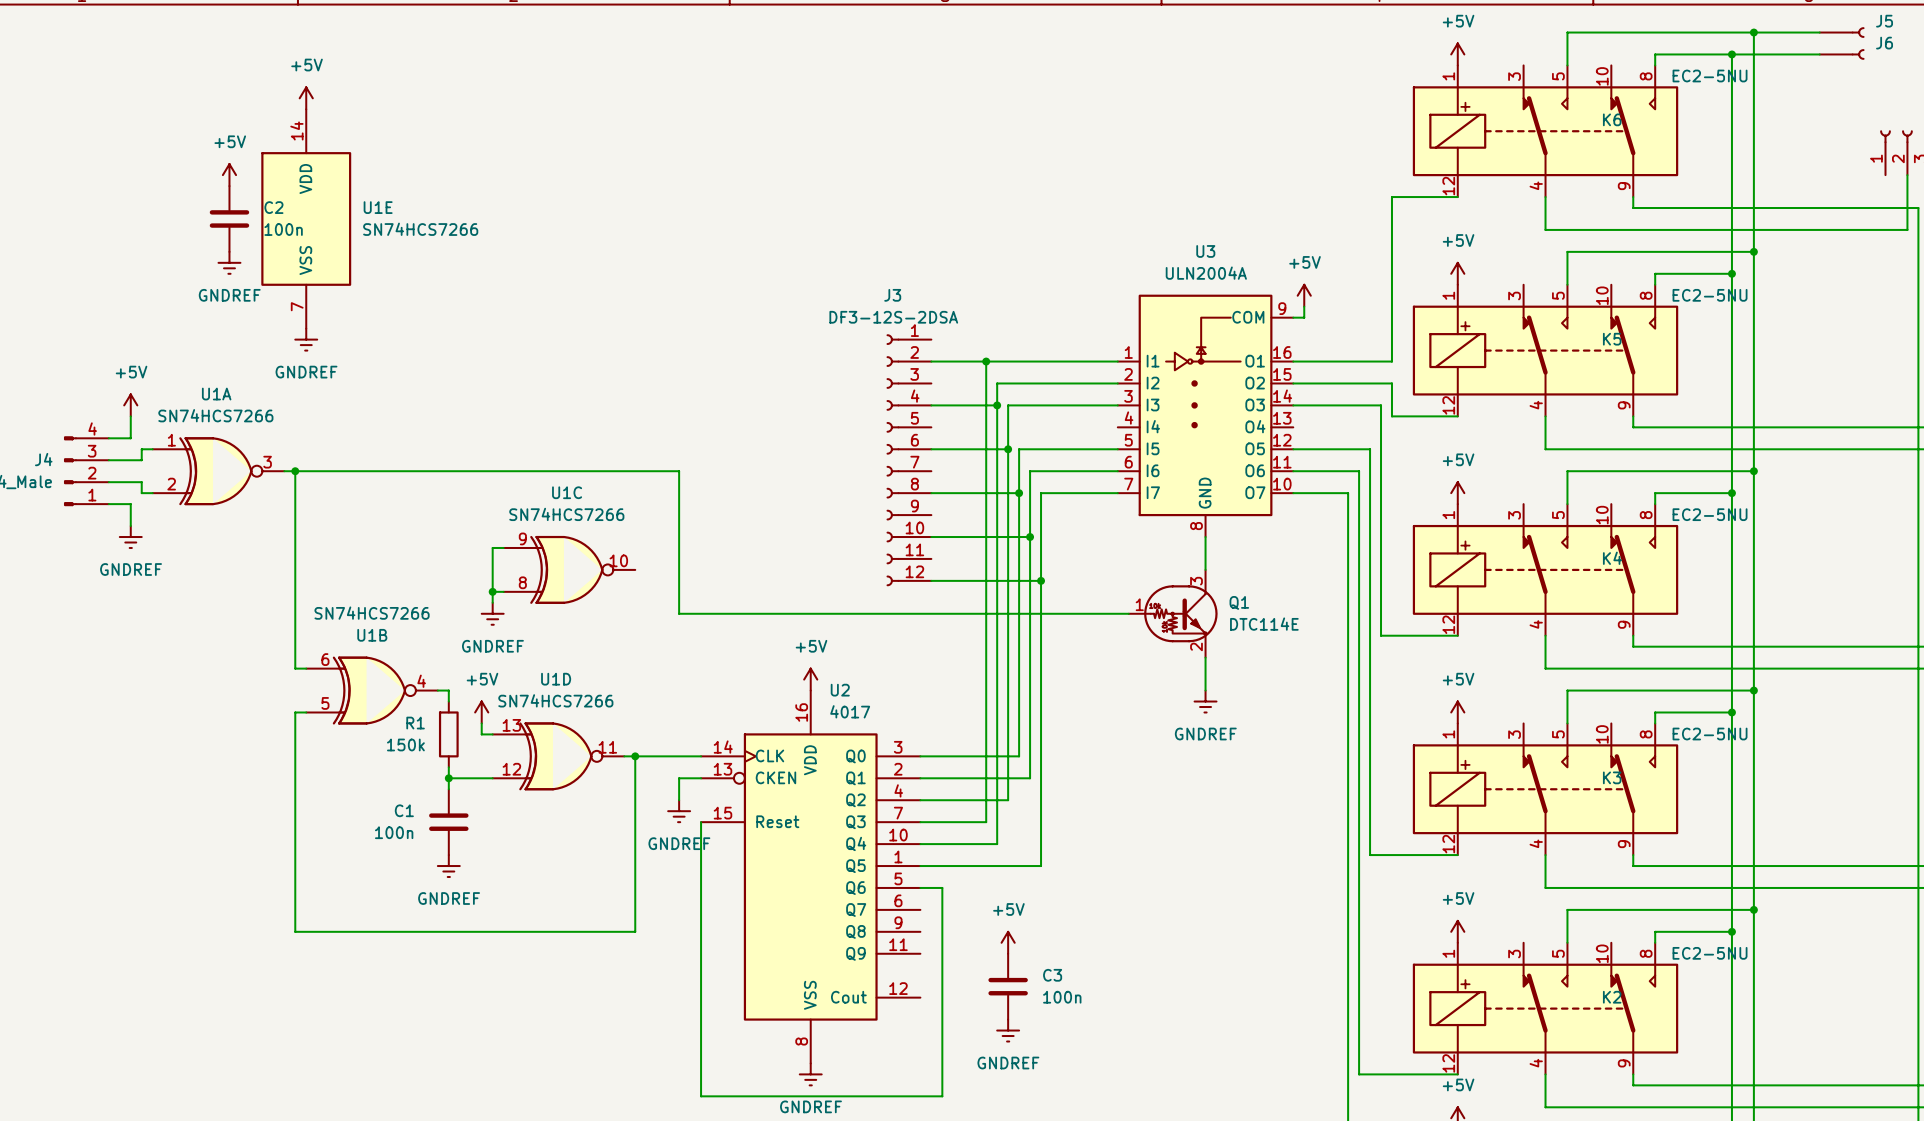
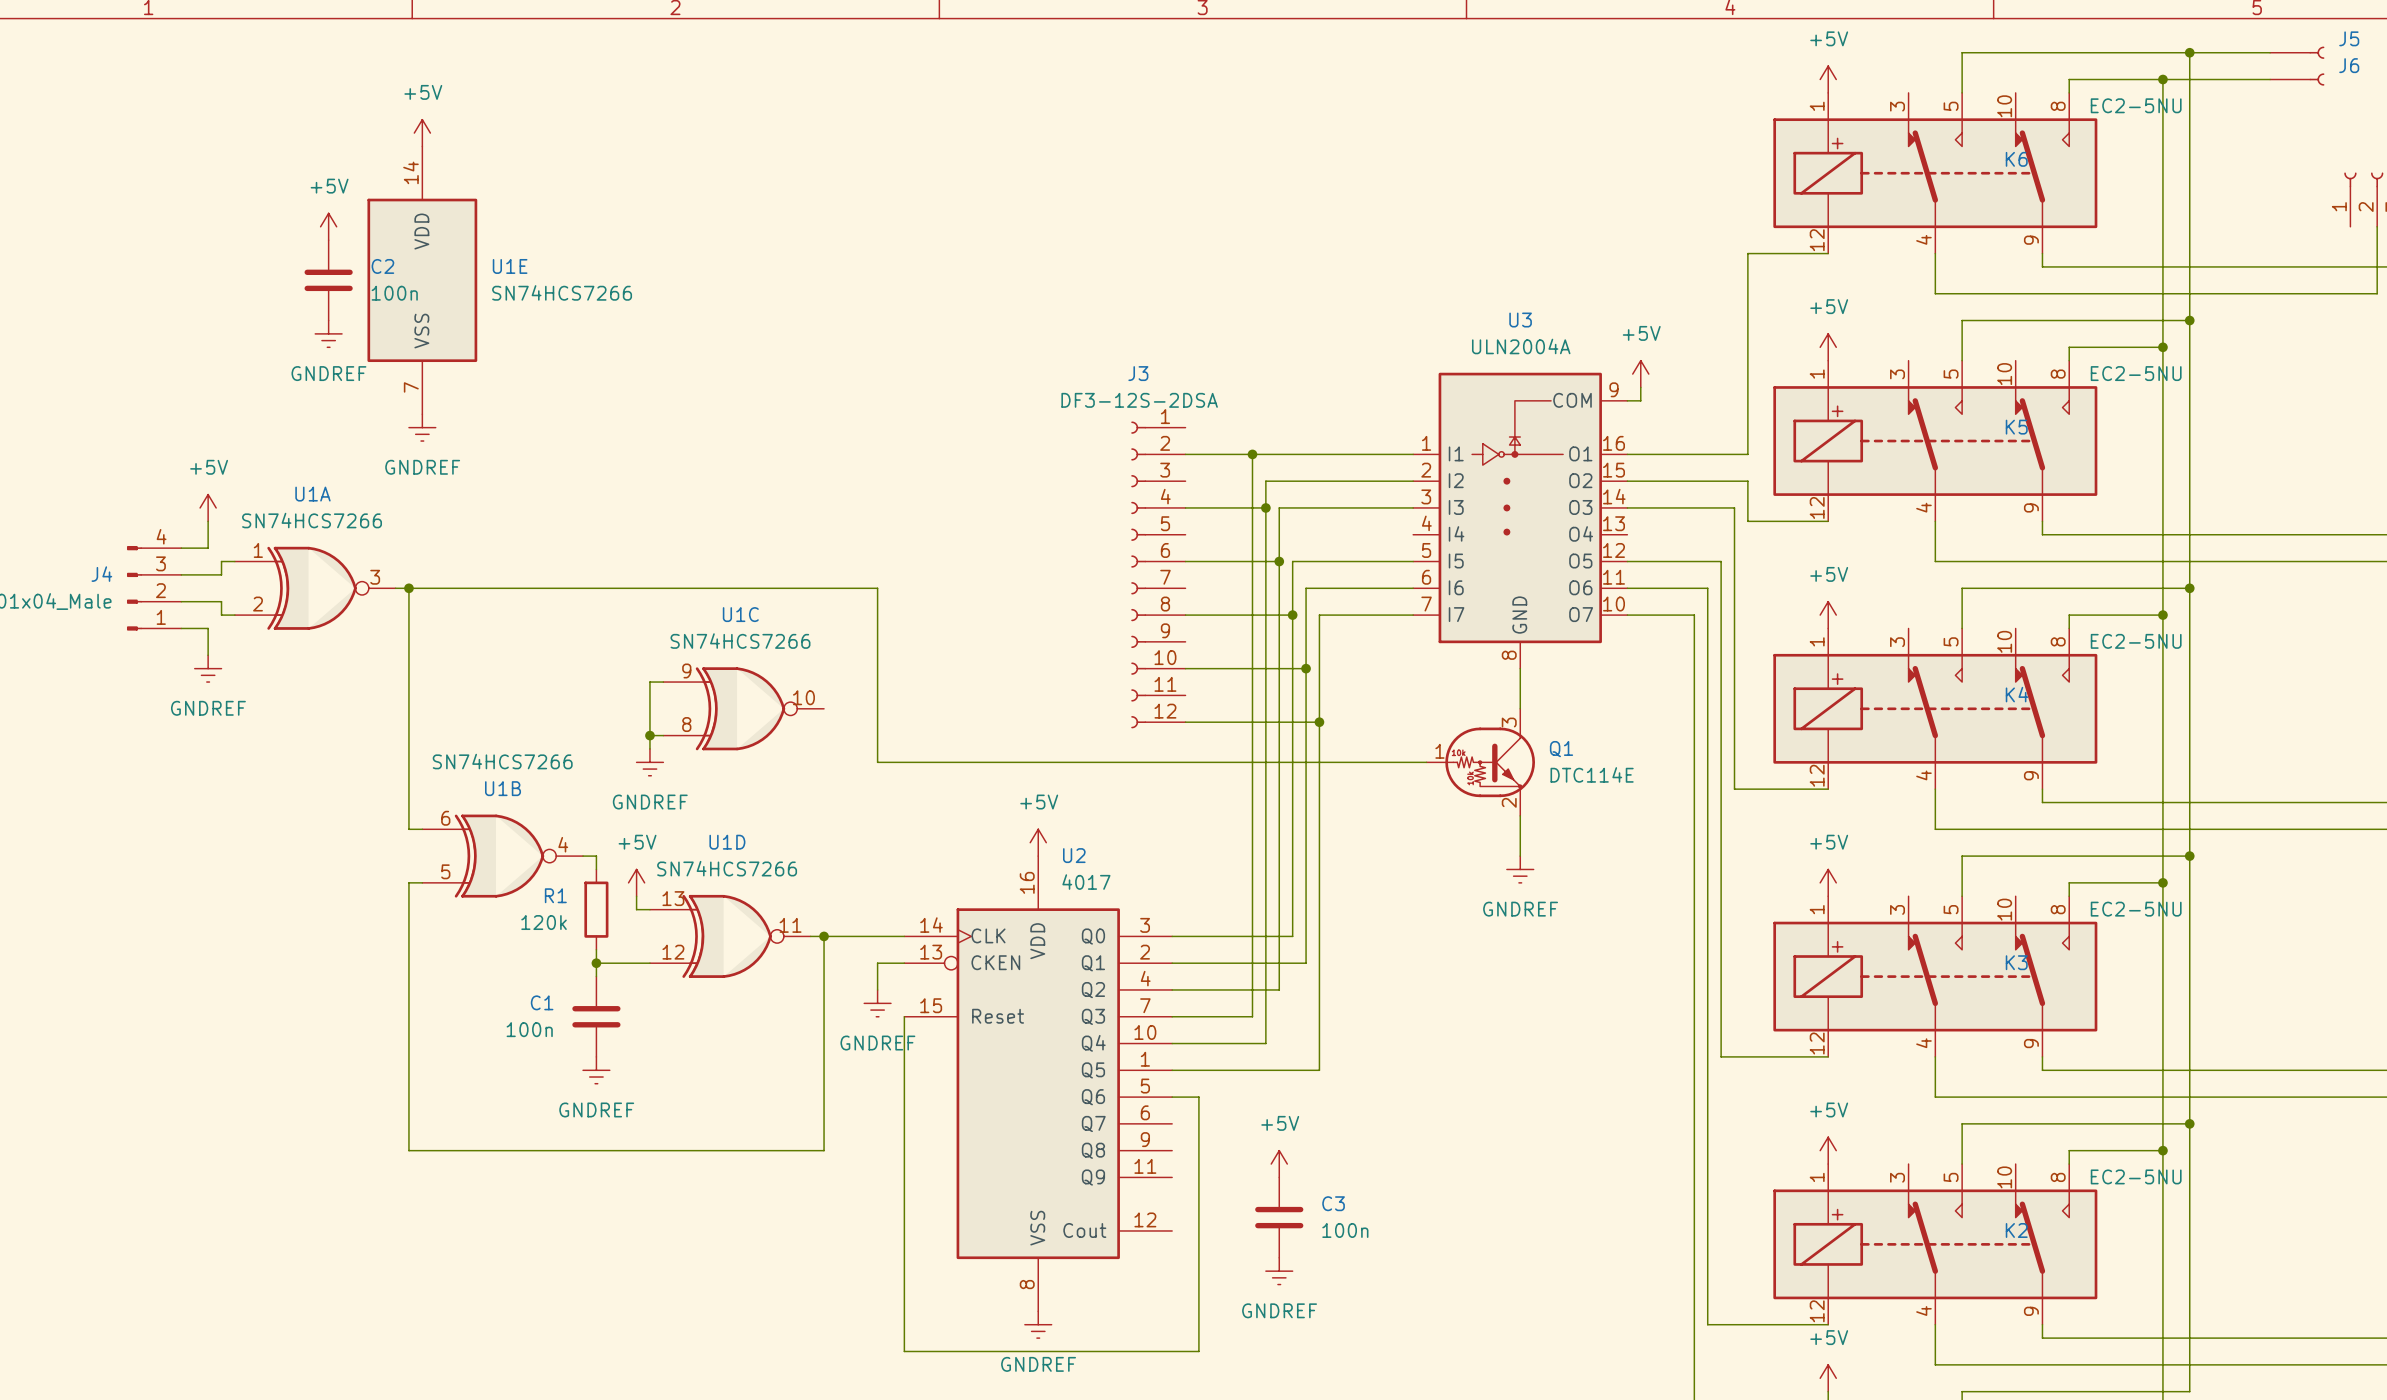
R1 value: 150k (405, 744) -> 120k (544, 922)

